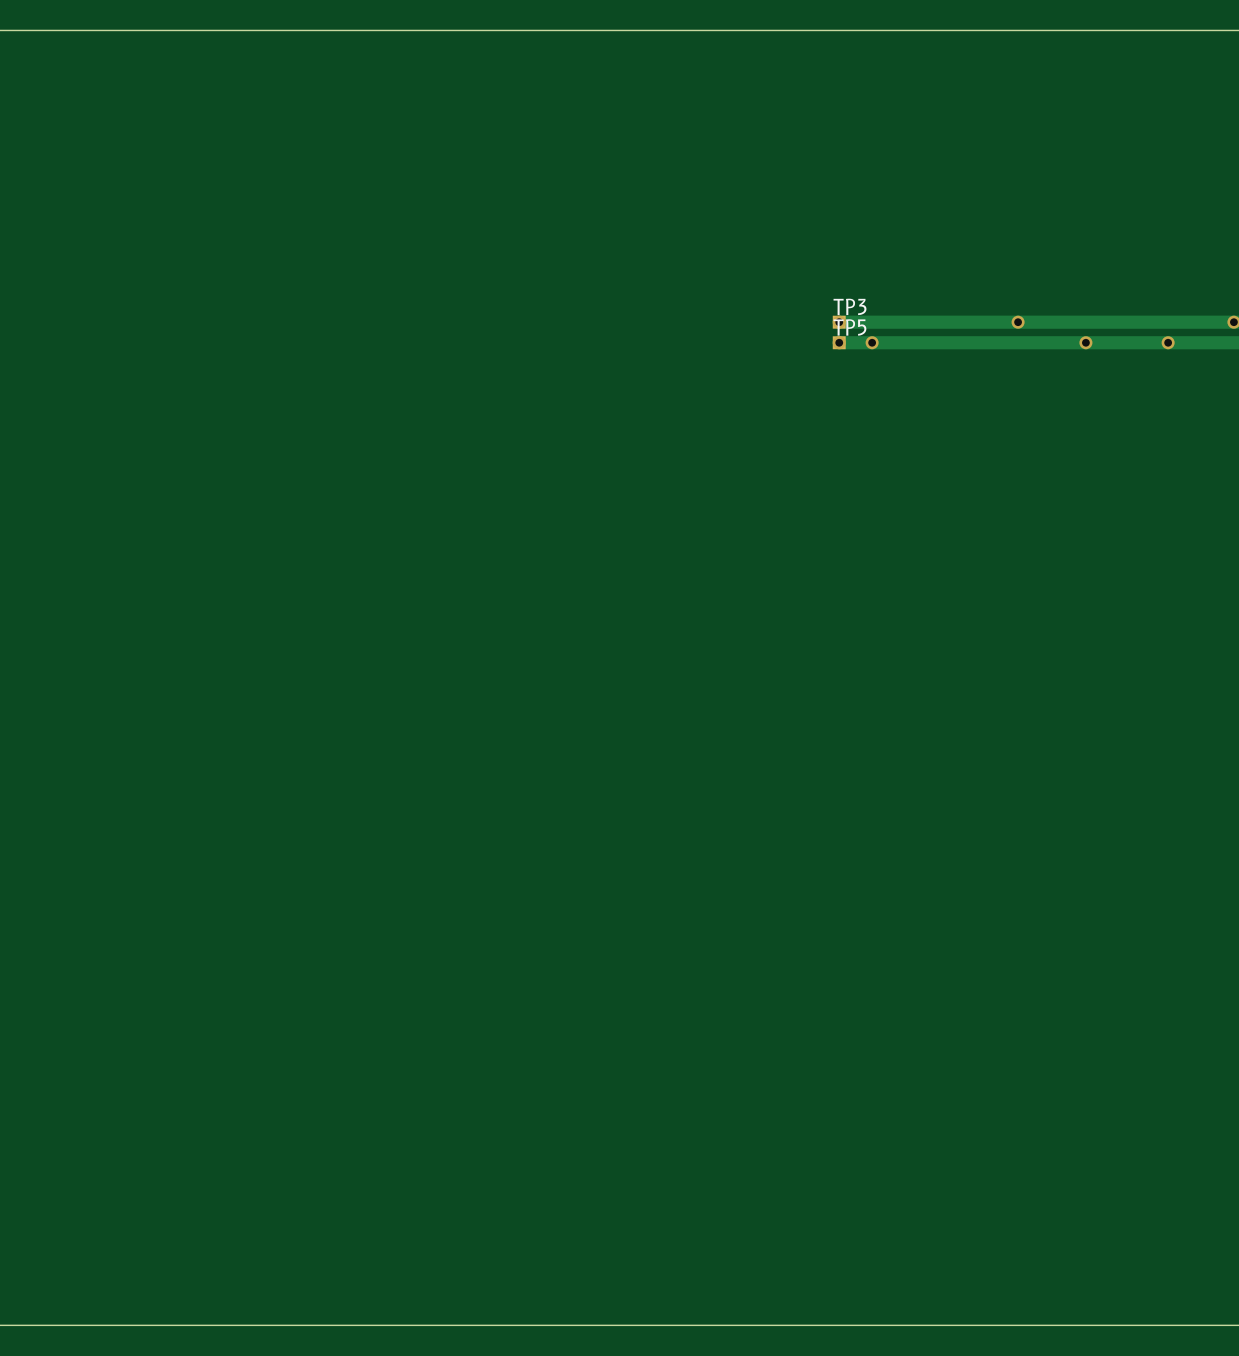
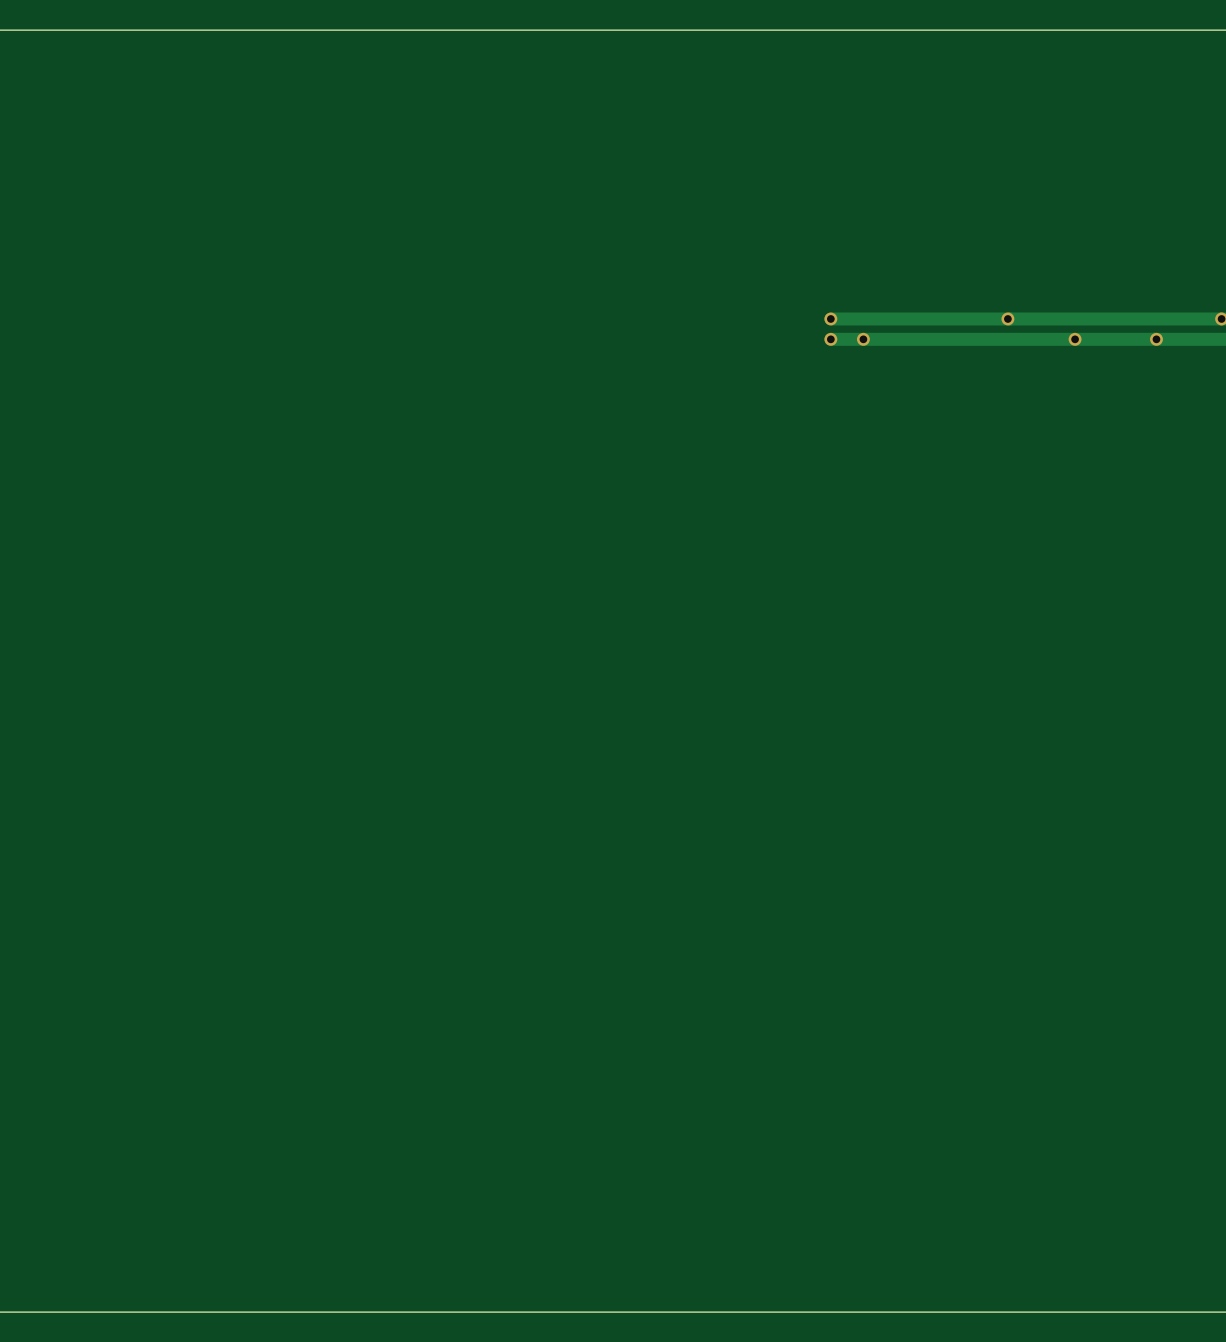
TP3: (839, 322) -> none
TP5: (839, 342) -> none

